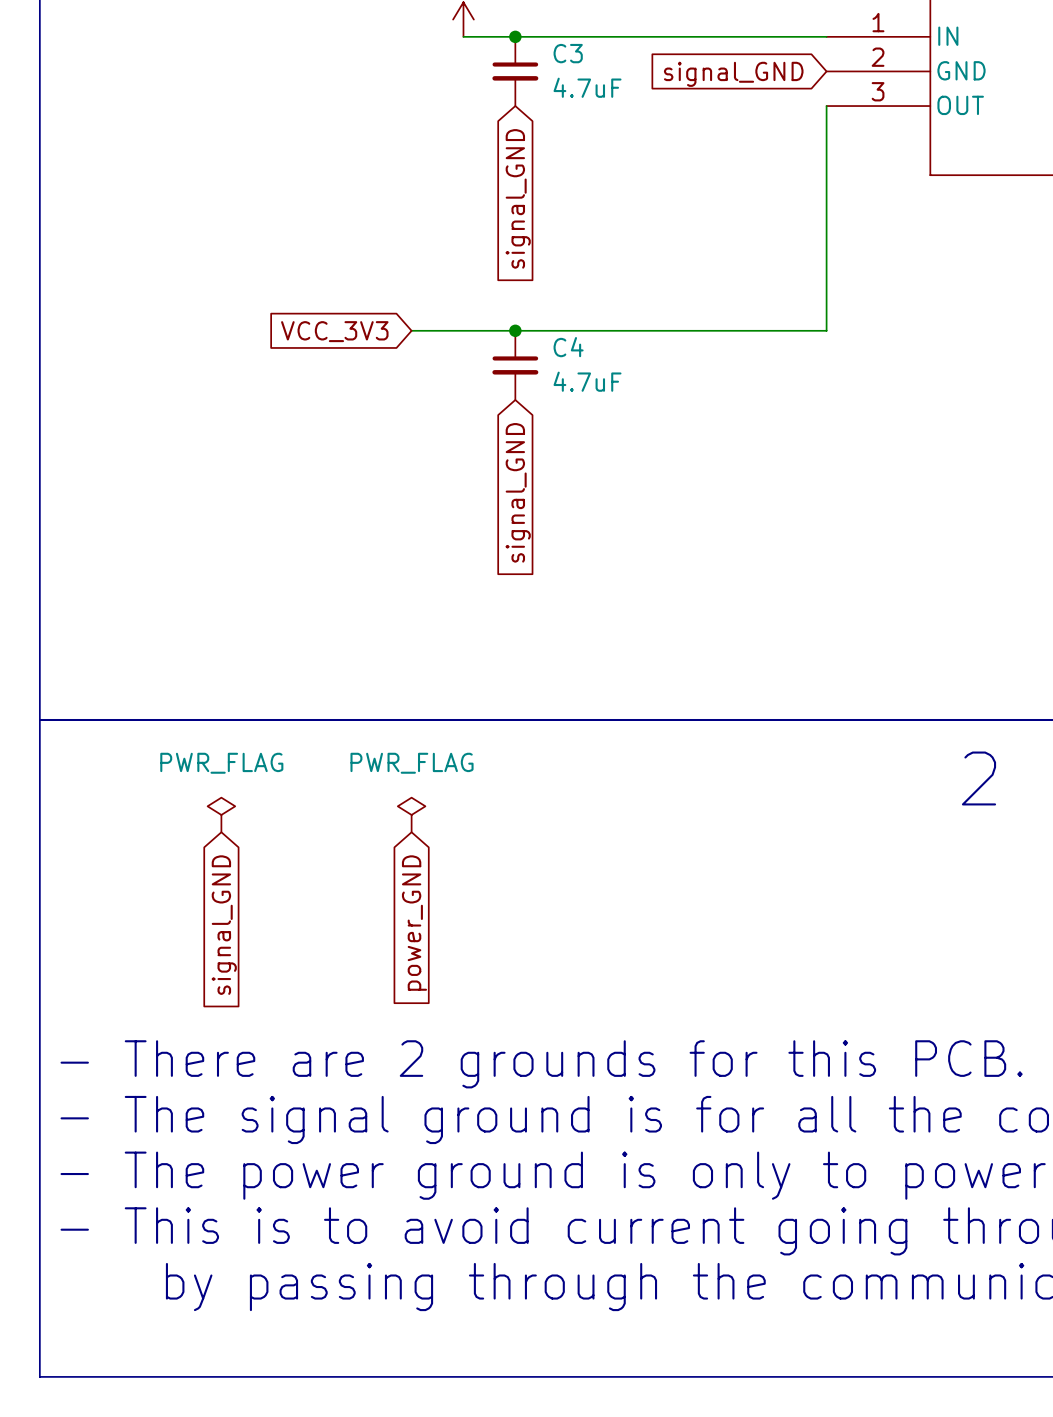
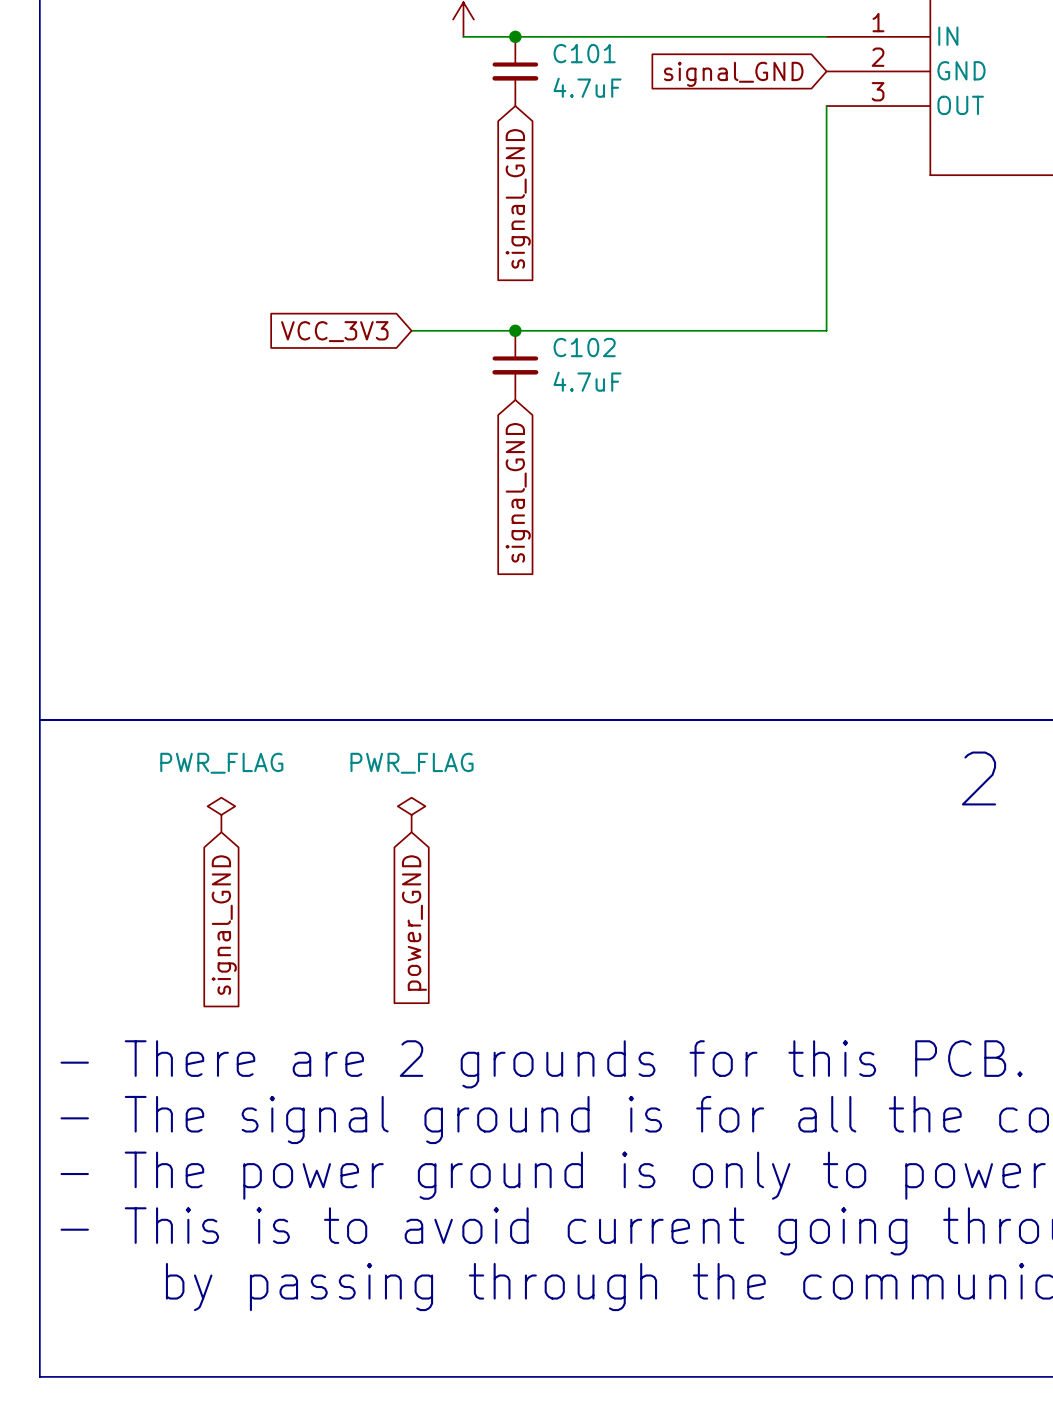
C3 name: C3 (568, 53) -> C101 (584, 53)
C4 name: C4 (568, 347) -> C102 (584, 347)

